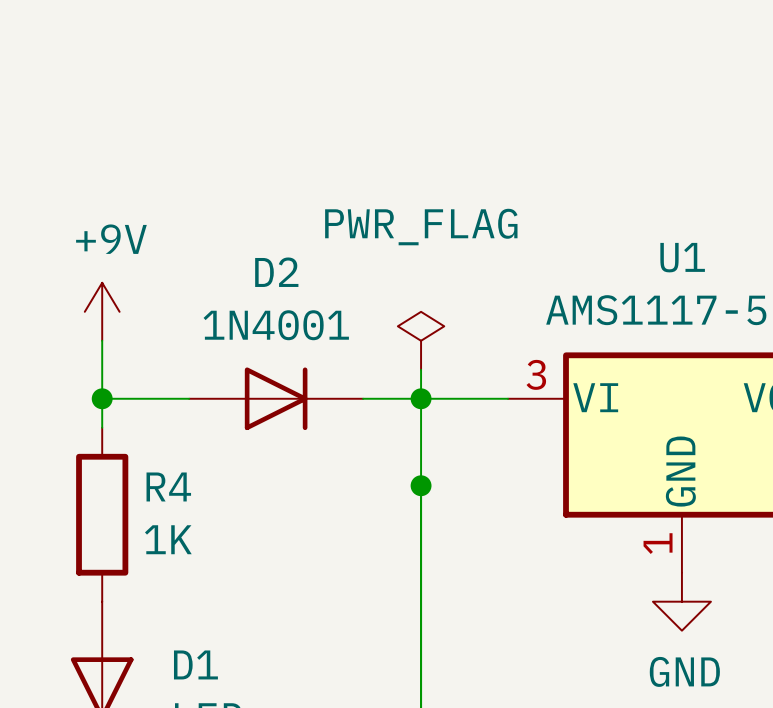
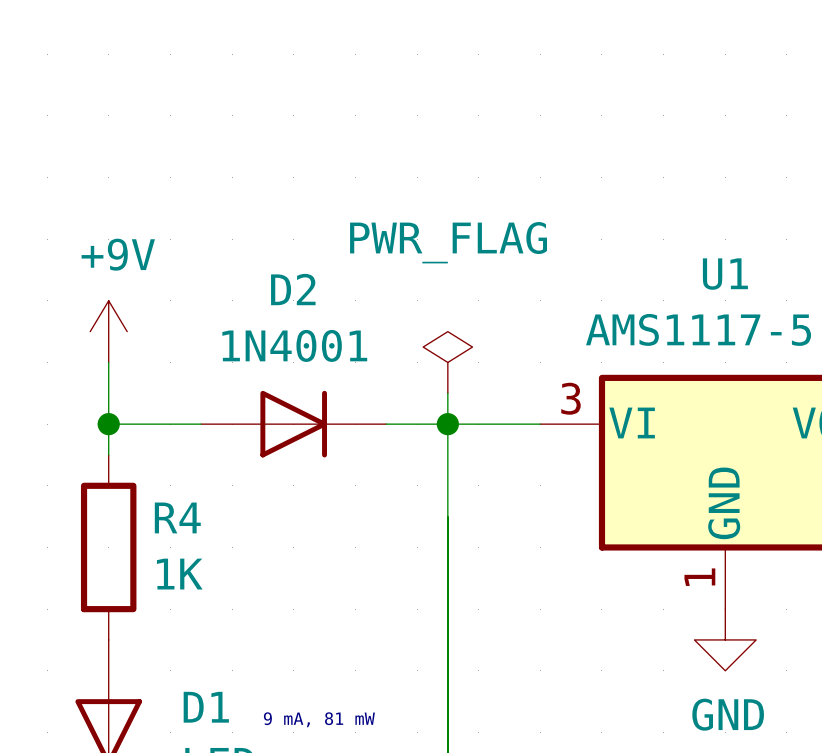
junction: (421, 485) -> none
text: none -> 9 mA, 81 mW (319, 719)

